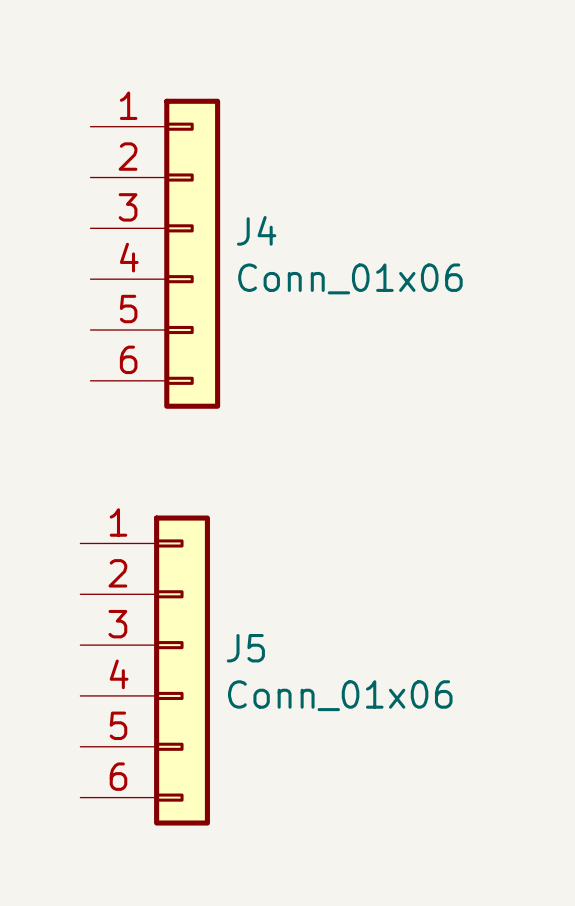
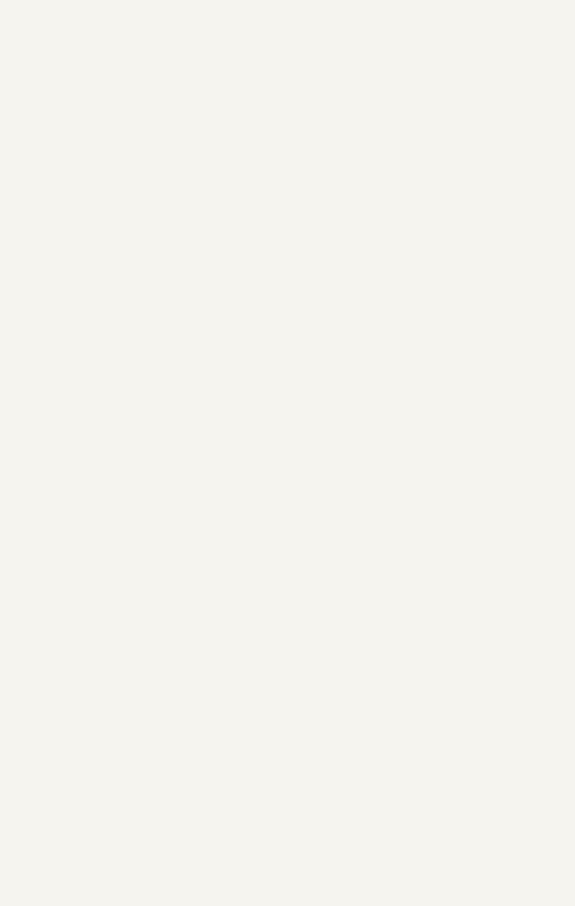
J4: Conn_01x06 (155, 253) -> none
J5: Conn_01x06 (145, 670) -> none

